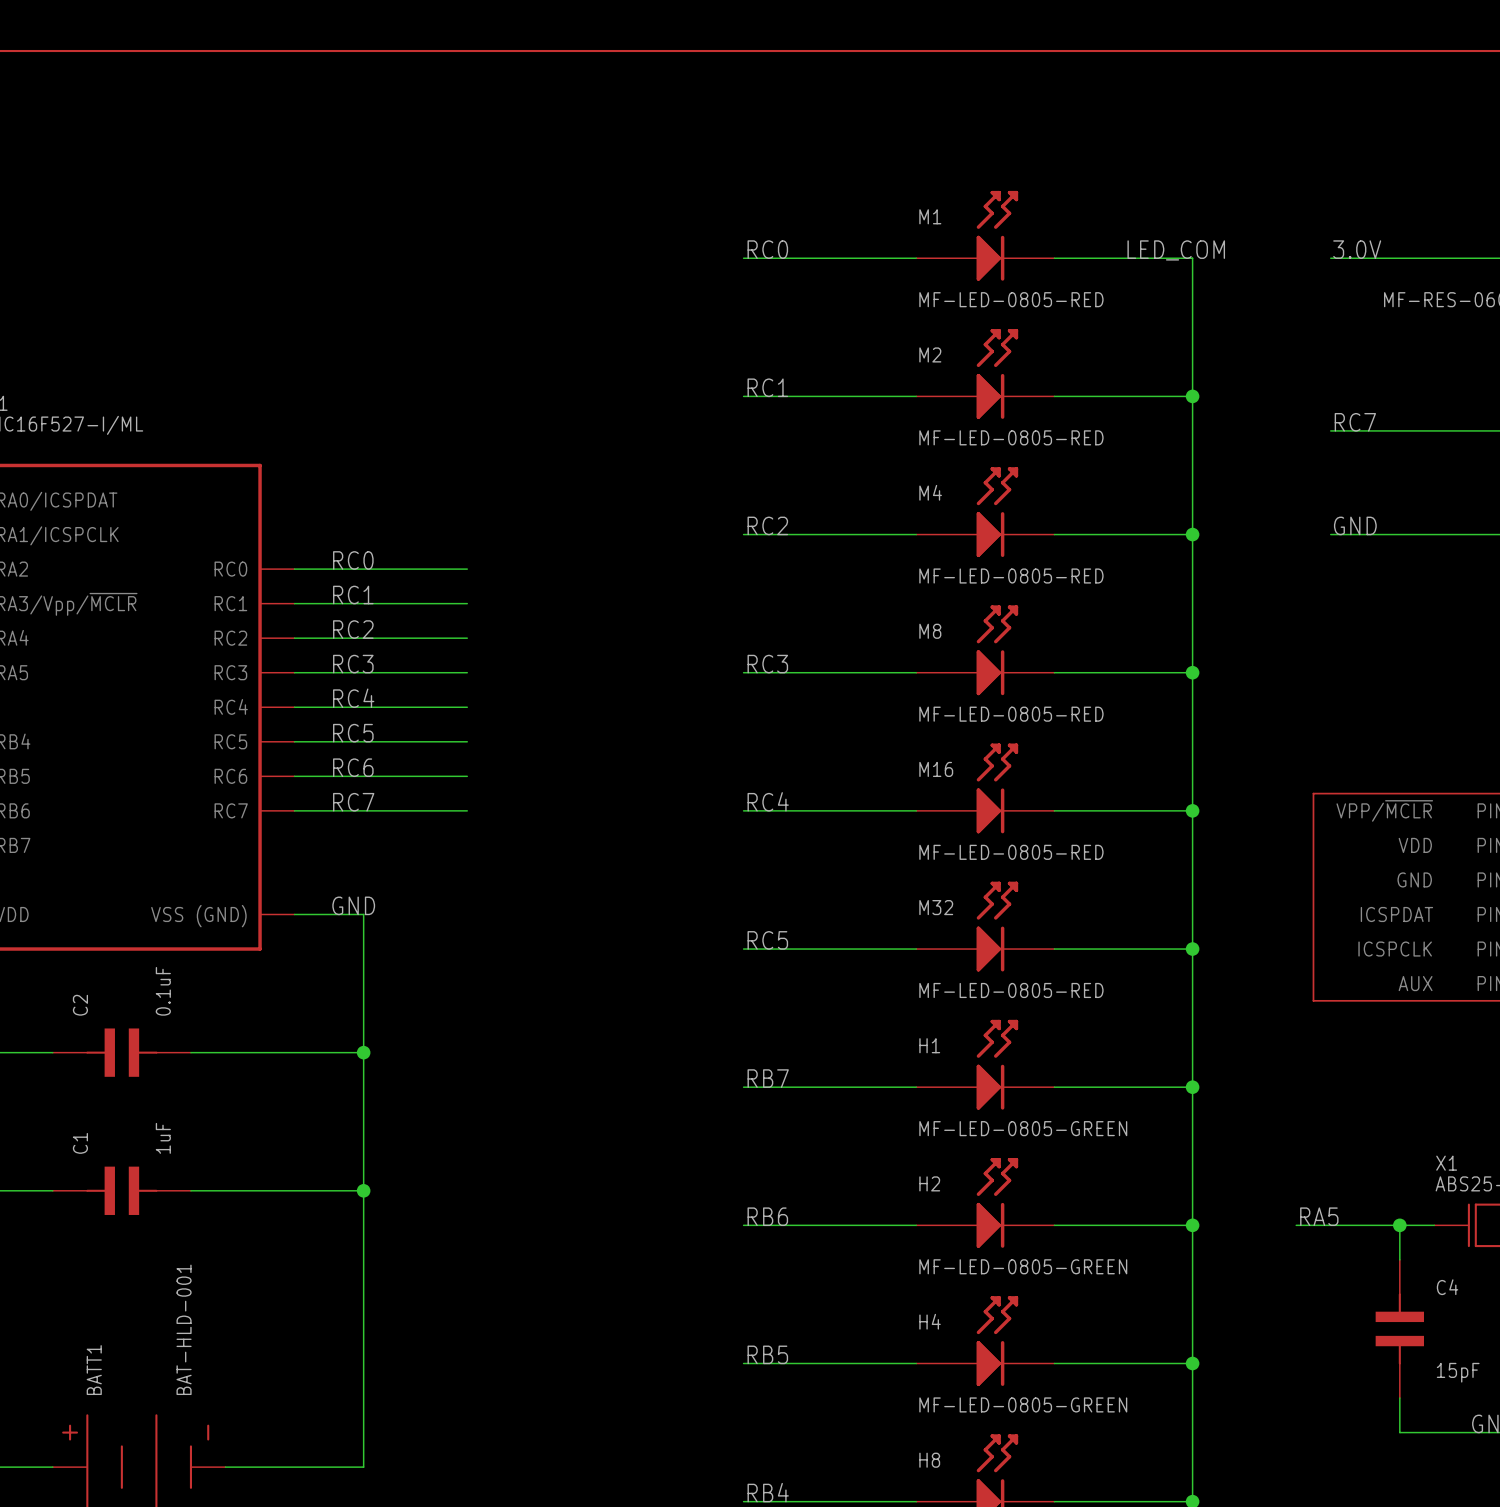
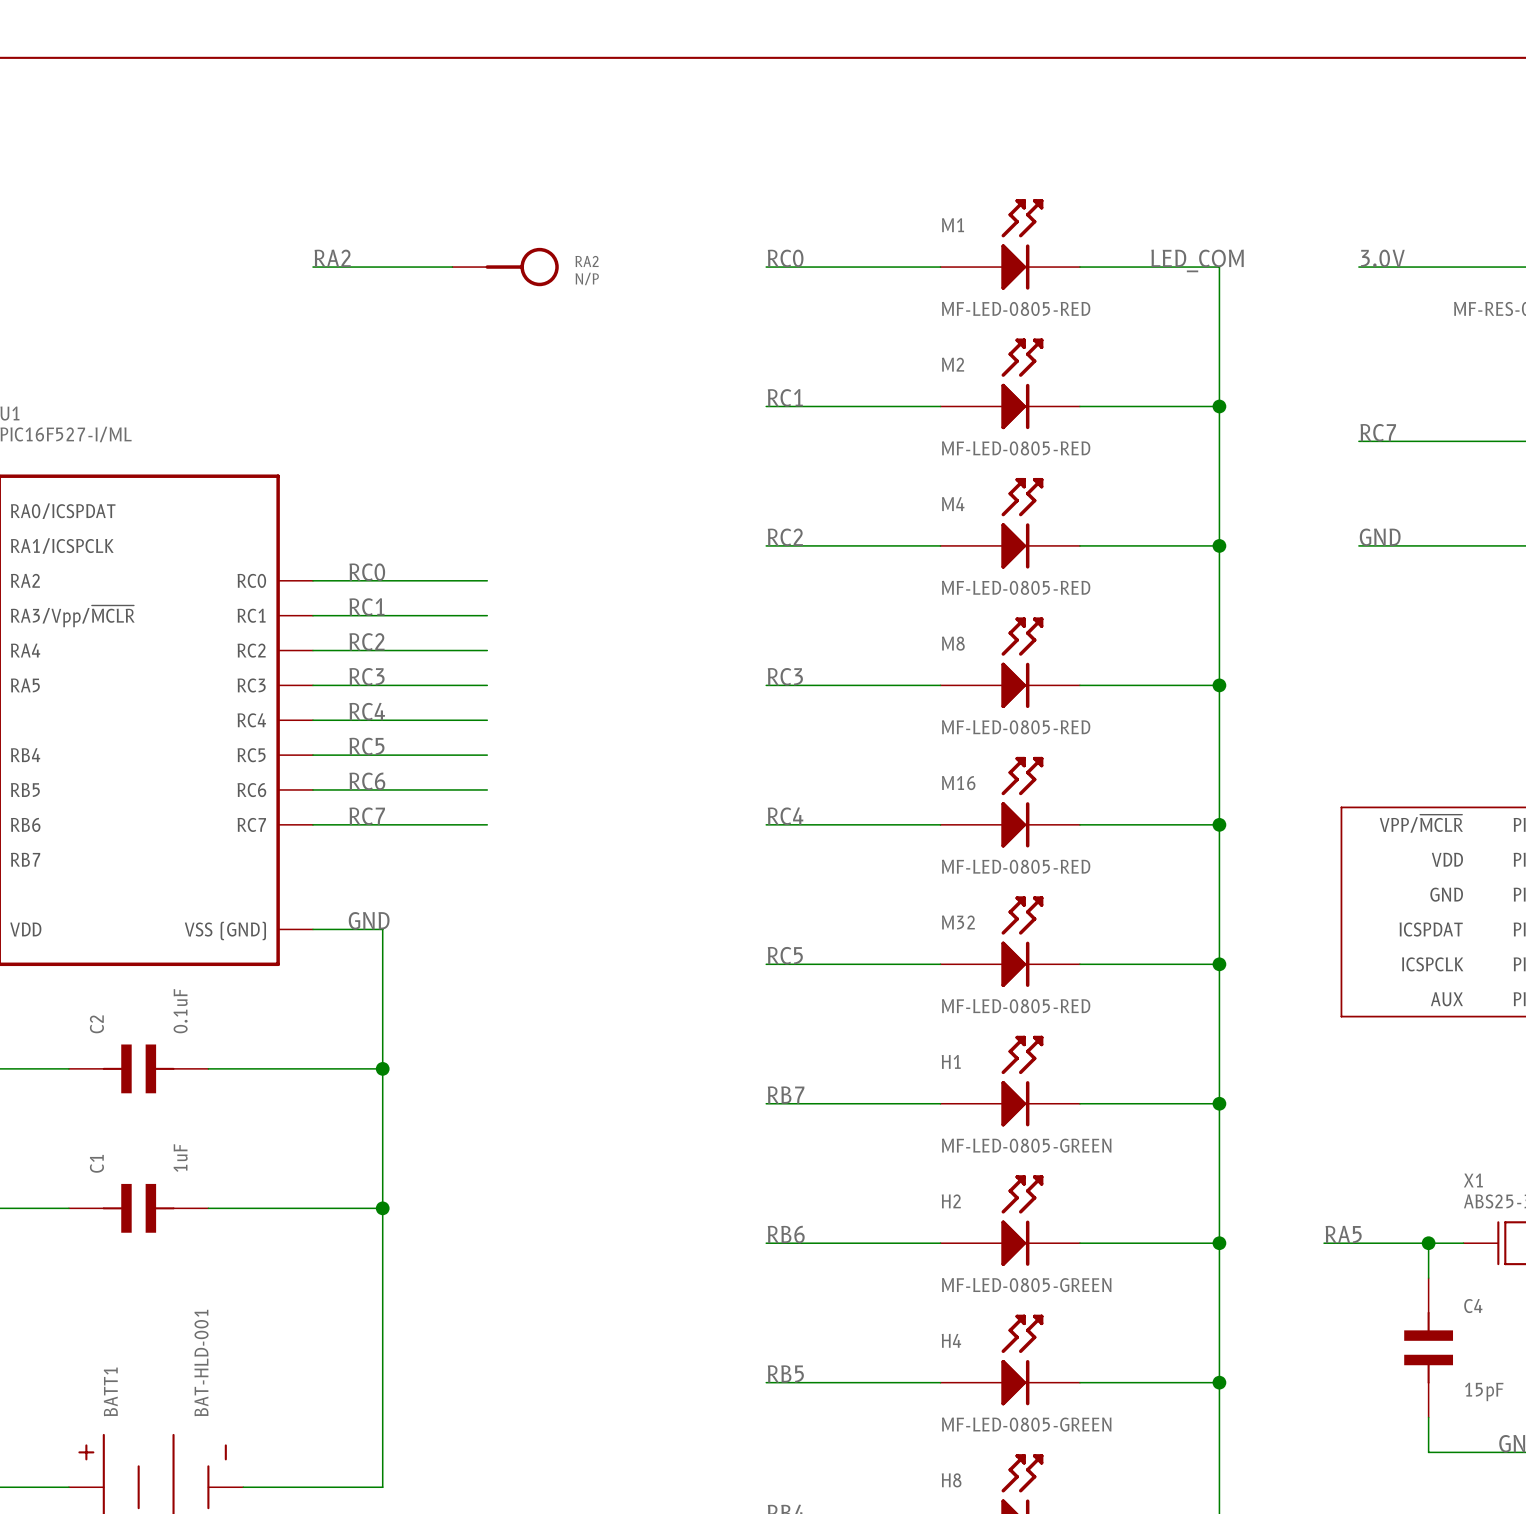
label: none -> RA2 (332, 258)
wire: none -> (312, 267) (452, 267)
RA2: none -> N/P (505, 267)

